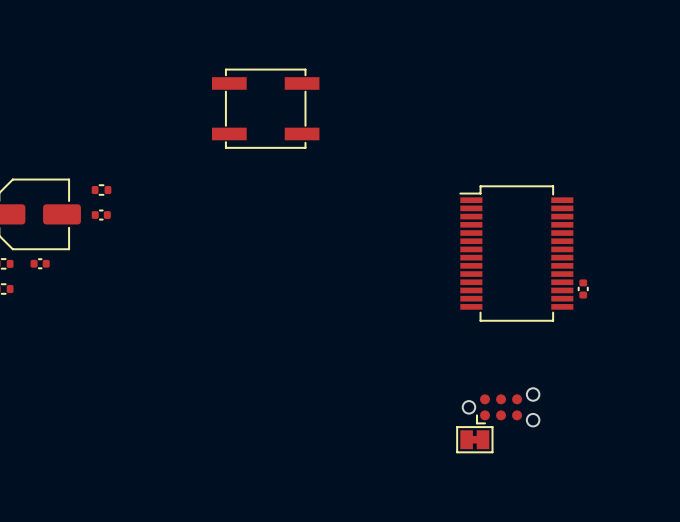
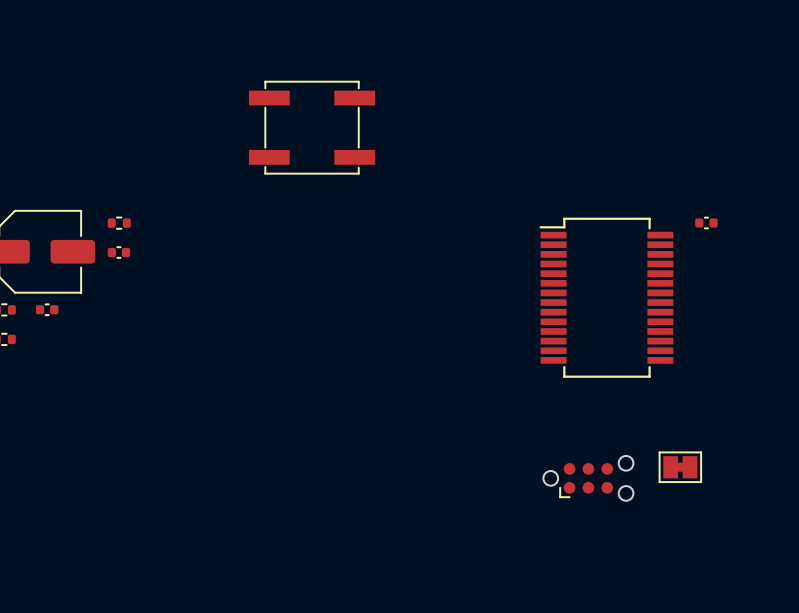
part rotation: 0° (583, 288) -> 90° clockwise (706, 223)
part position: (583, 288) -> (706, 223)
part position: (474, 439) -> (680, 467)

